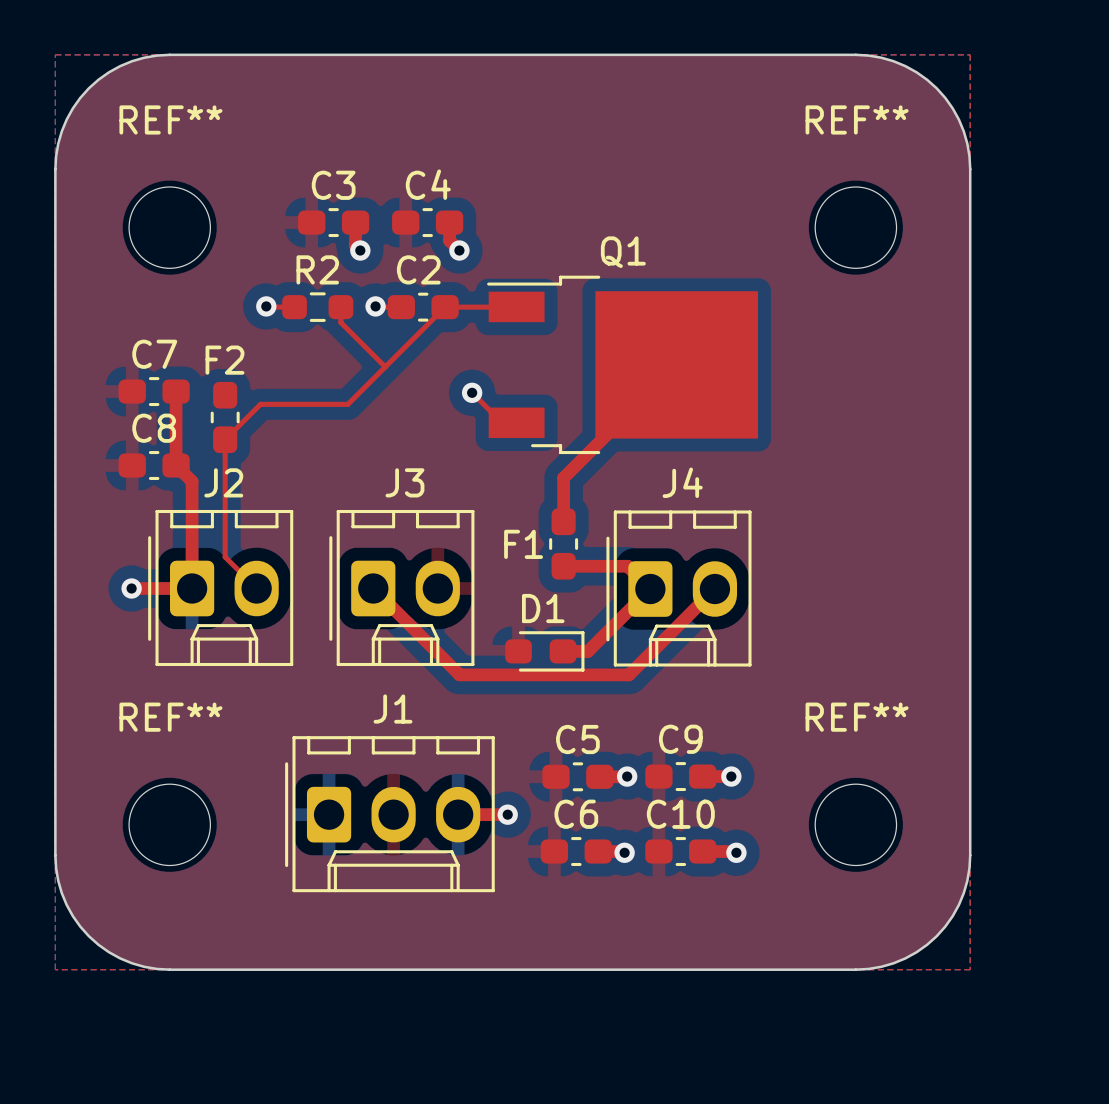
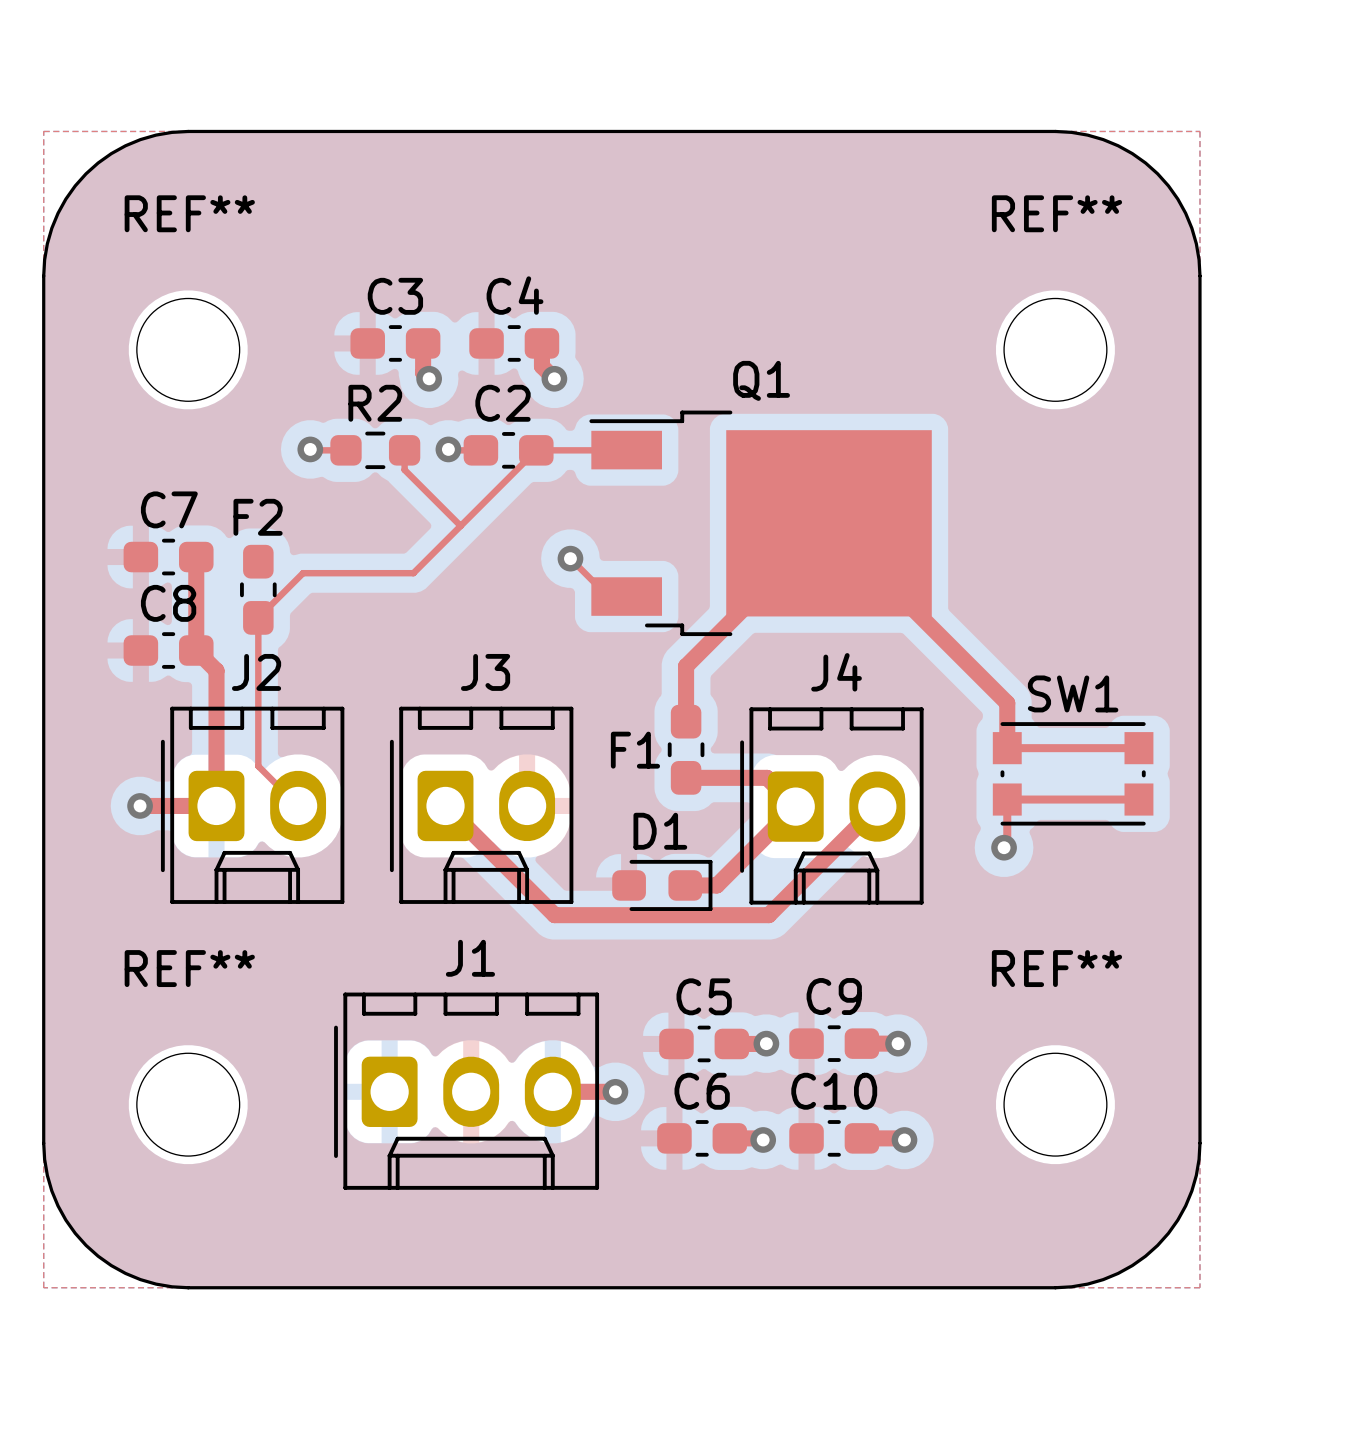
top track: none -> (829, 523) (1007, 703) (1007, 748) (1138, 748)
SW1: none -> (1073, 773)
top track: none -> (1138, 799) (1007, 799) (1007, 844) (1004, 847)
via: none -> (1004, 847)

